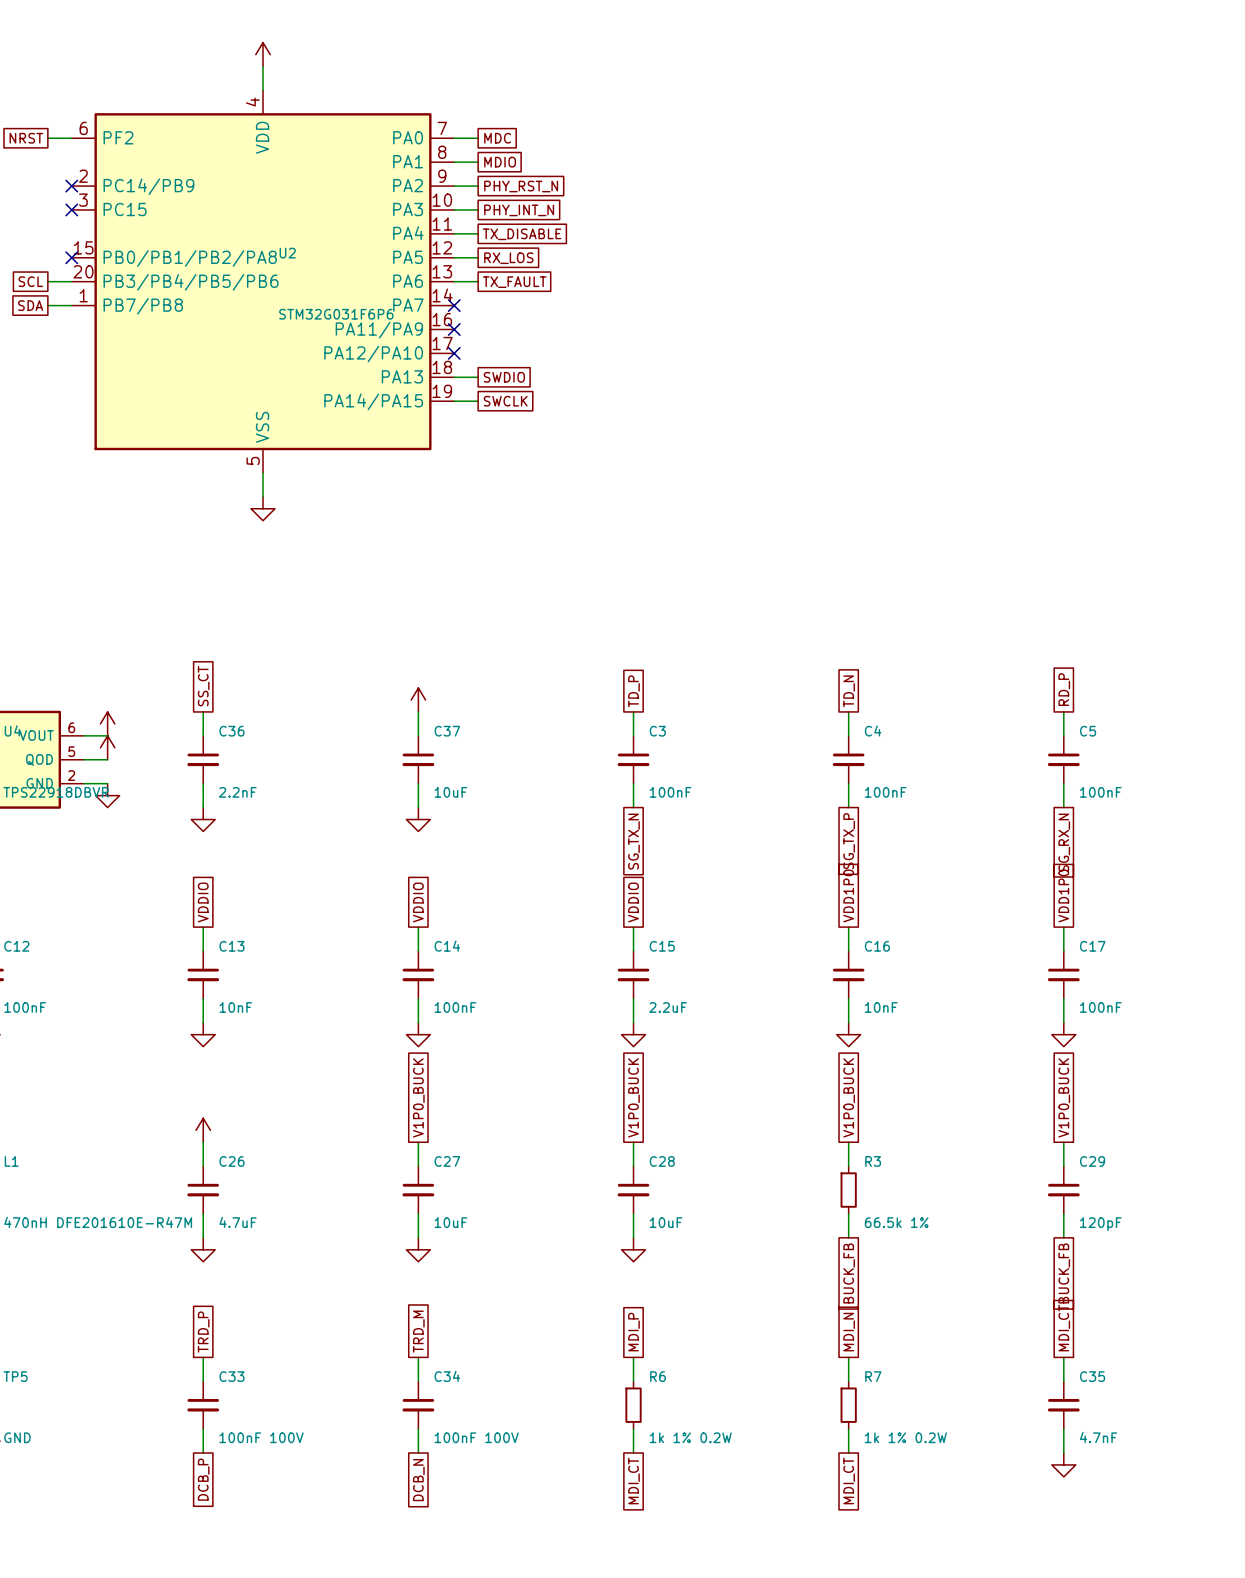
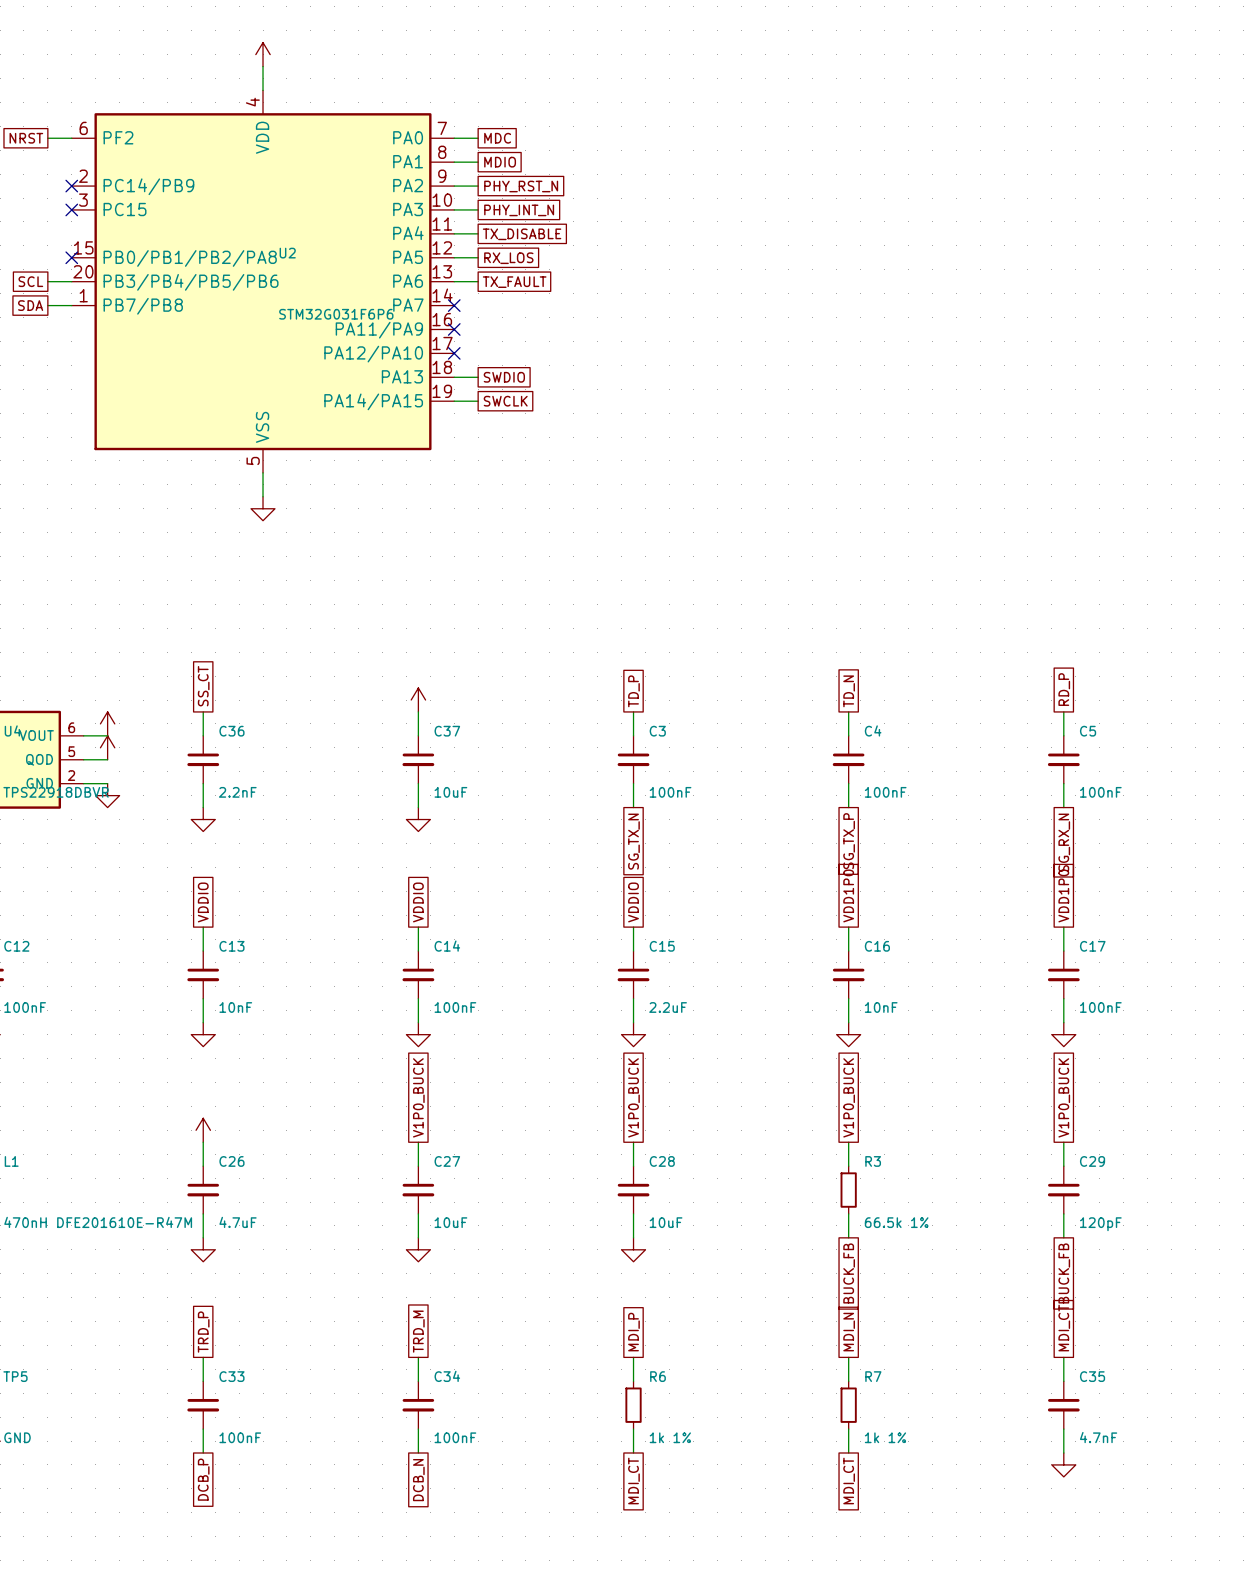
C33 value: 100nF 100V (261, 1437) -> 100nF (240, 1437)
C34 value: 100nF 100V (476, 1437) -> 100nF (455, 1437)
R6 value: 1k 1% 0.2W (690, 1437) -> 1k 1% (670, 1437)
R7 value: 1k 1% 0.2W (905, 1437) -> 1k 1% (885, 1437)

